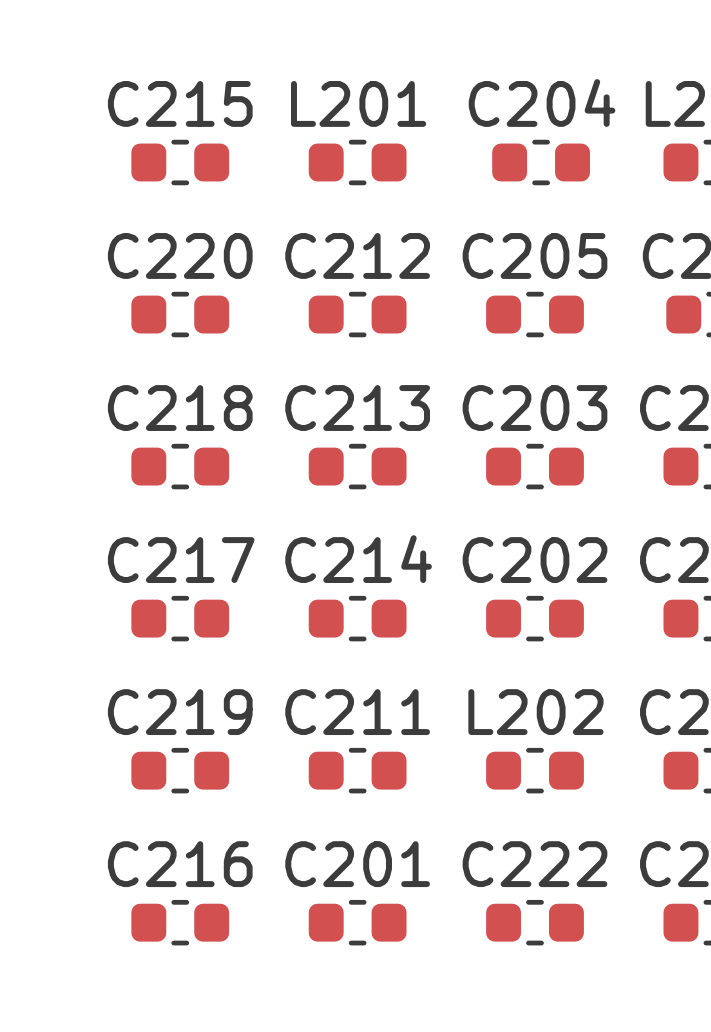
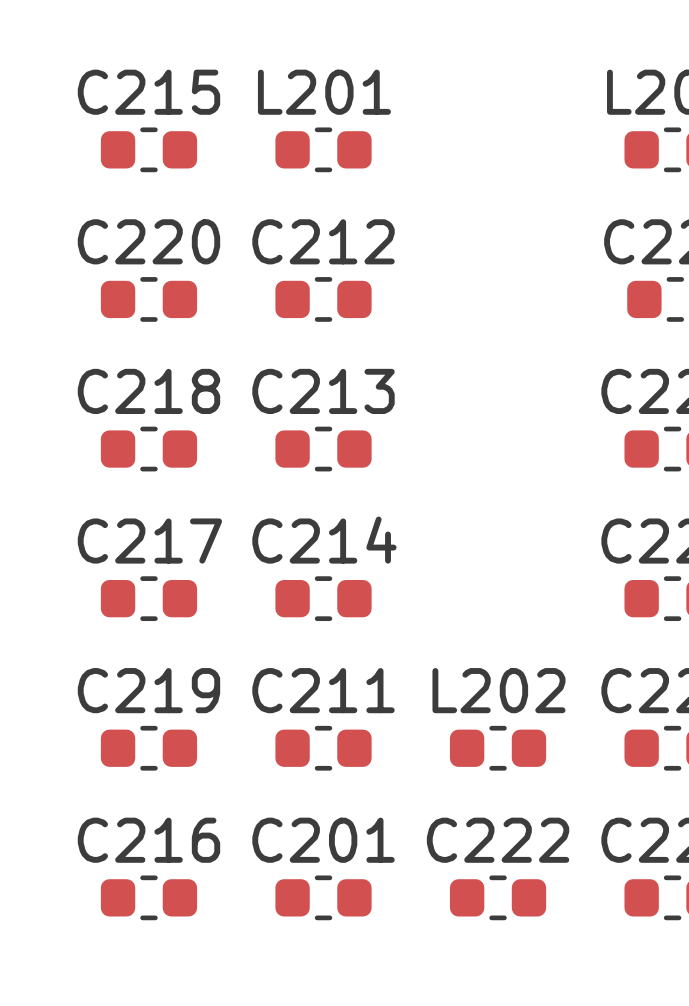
C204: (541, 162) -> none
C205: (535, 314) -> none
C203: (535, 466) -> none
C202: (535, 618) -> none

